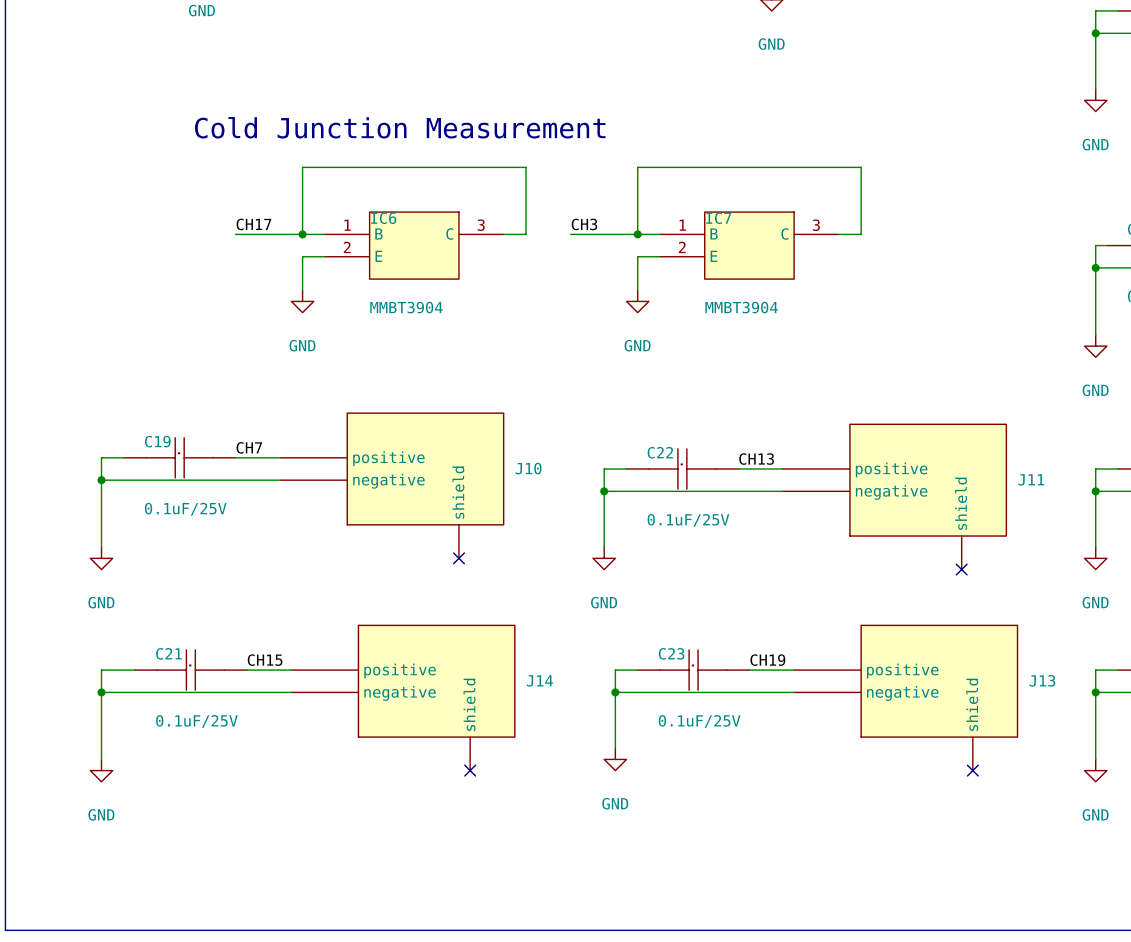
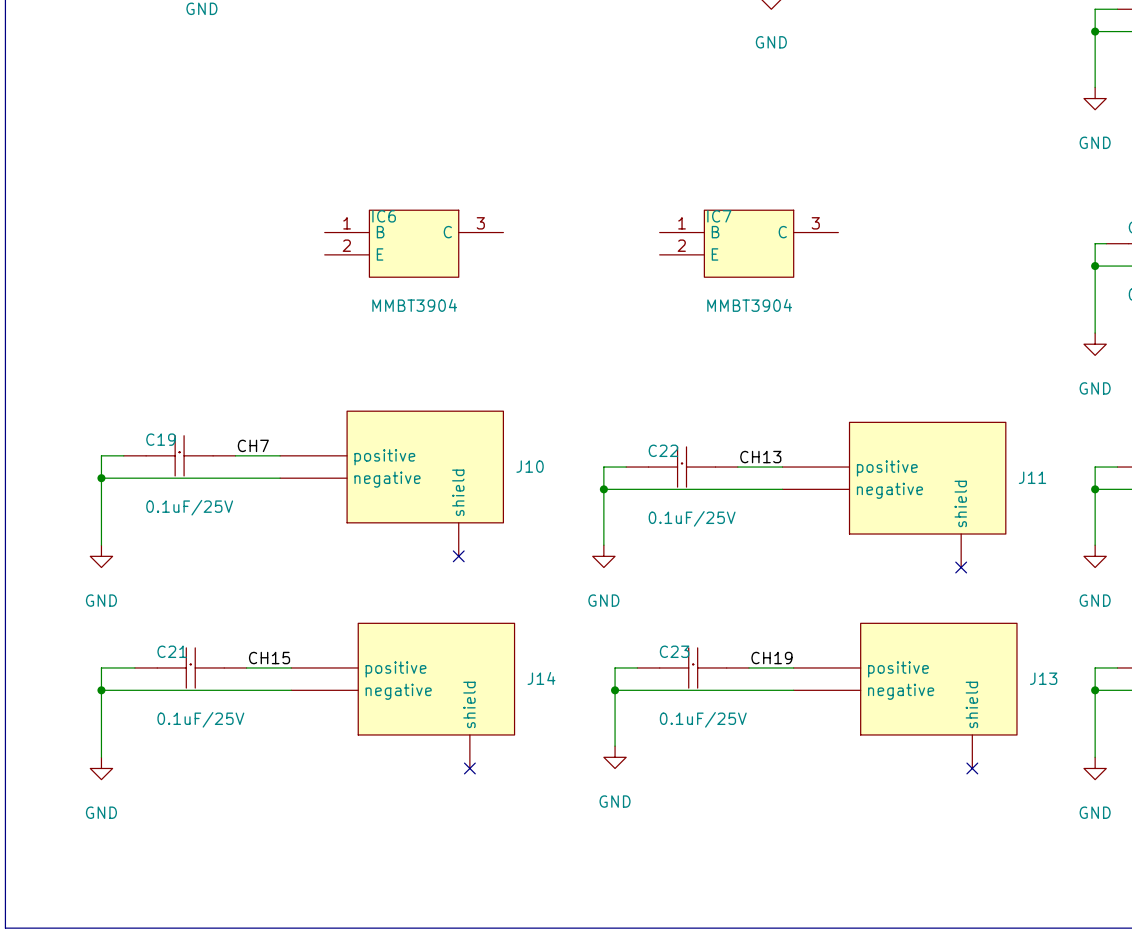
text: Cold Junction Measurement (400, 127) -> none
label: CH17 (253, 224) -> none
label: CH3 (584, 224) -> none
wire: (235, 234) (324, 234) -> none
wire: (302, 234) (302, 167) (526, 167) (526, 234) (503, 234) -> none
junction: (302, 234) -> none
wire: (570, 234) (660, 234) -> none
wire: (637, 234) (637, 167) (861, 167) (861, 234) (838, 234) -> none
junction: (637, 234) -> none
wire: (324, 256) (302, 256) (302, 290) -> none
wire: (660, 256) (637, 256) (637, 290) -> none
power symbol: GND (302, 301) -> none
power symbol: GND (637, 301) -> none

